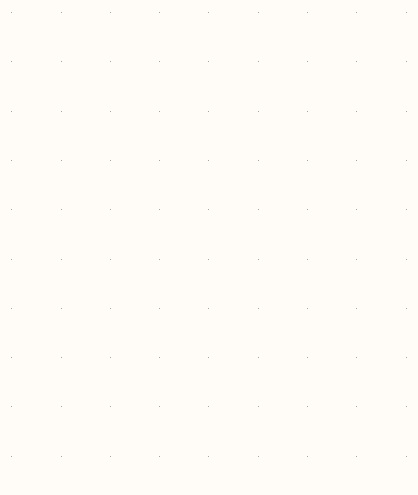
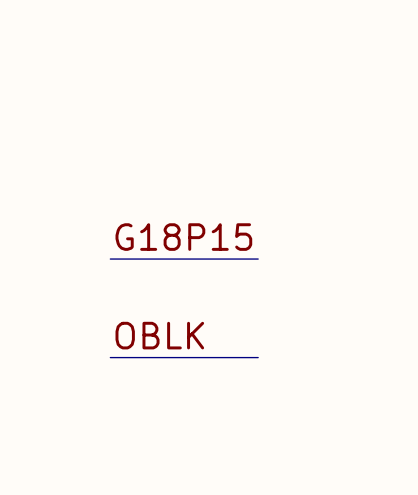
label: none -> G18P15 (183, 237)
wire: none -> (110, 259) (258, 259)
label: none -> OBLK (159, 335)
wire: none -> (110, 357) (258, 357)

